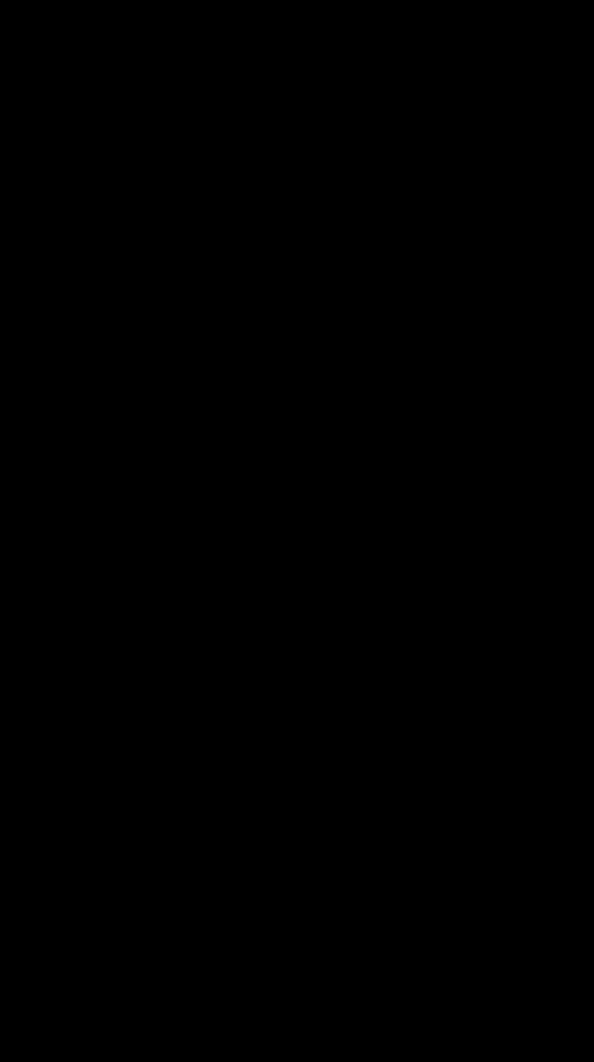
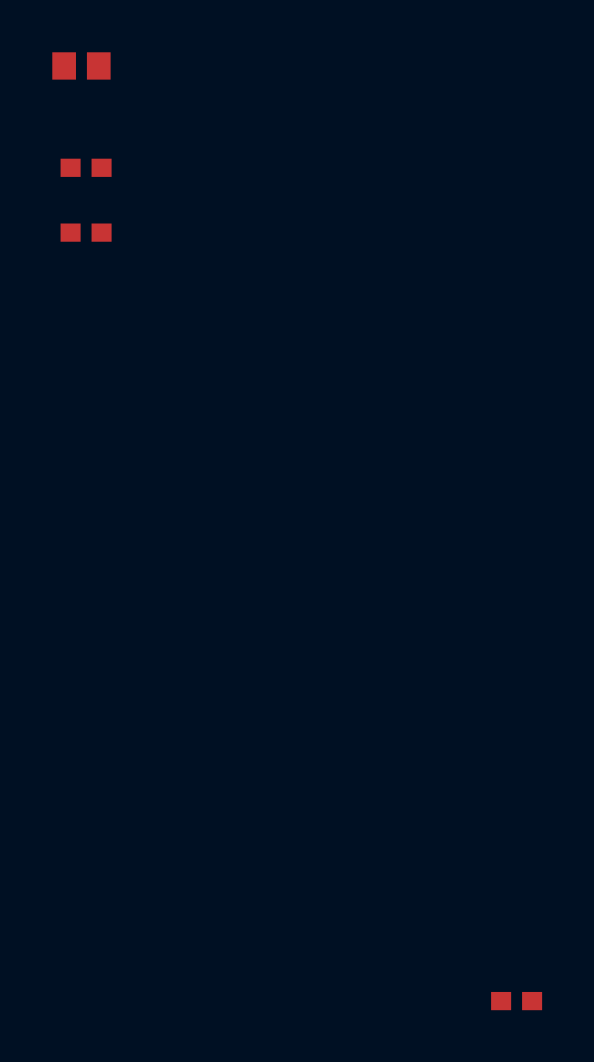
part: none -> (81, 65)
part: none -> (86, 167)
part: none -> (86, 232)
part: none -> (516, 1001)

